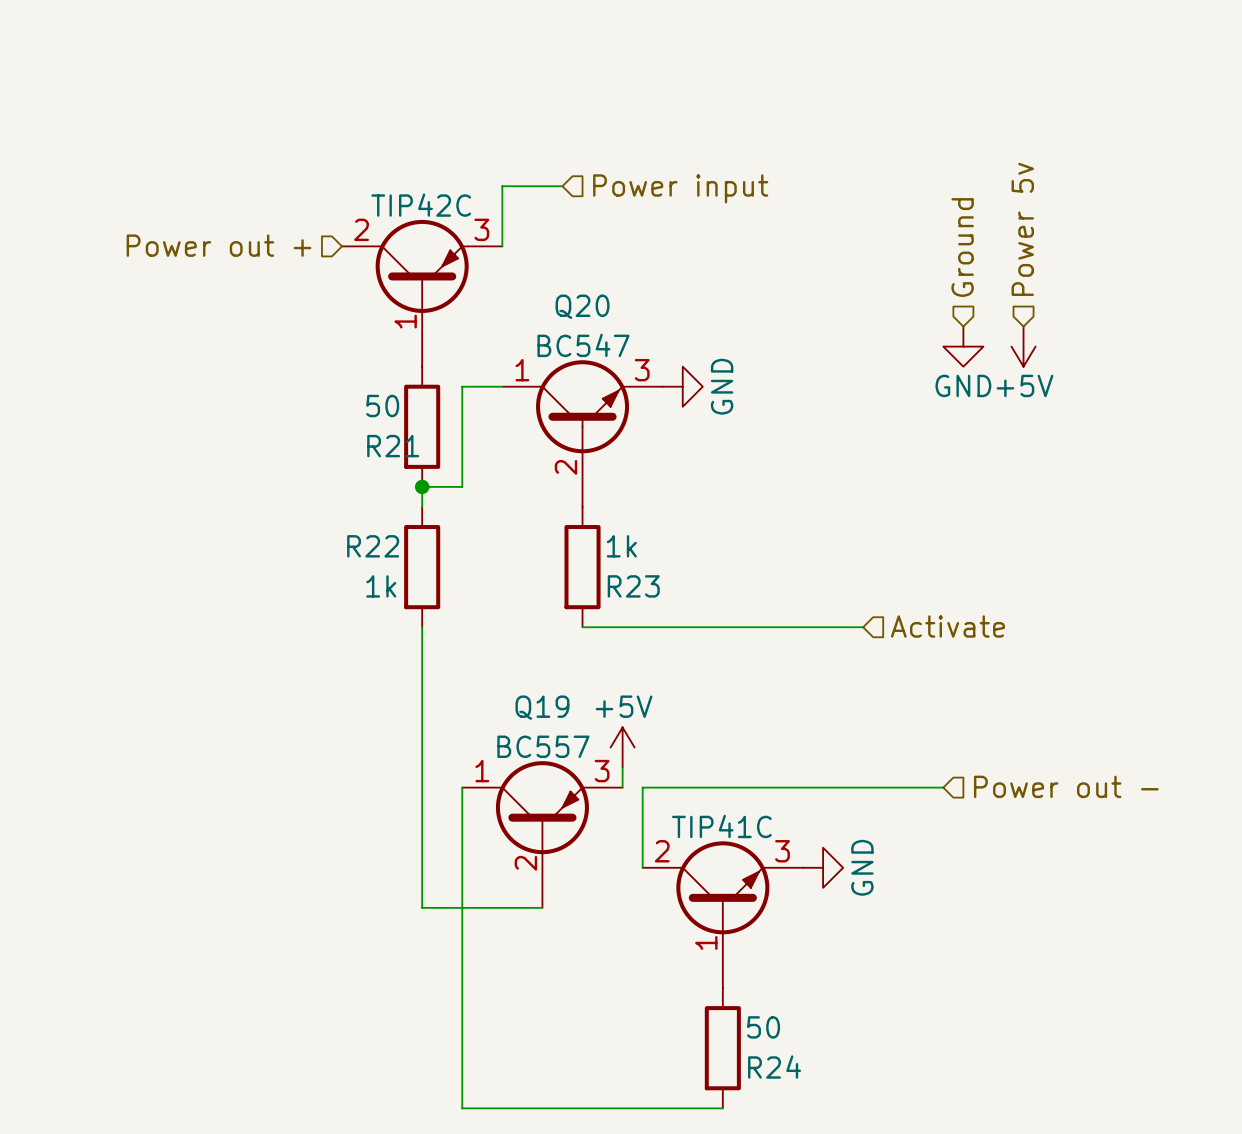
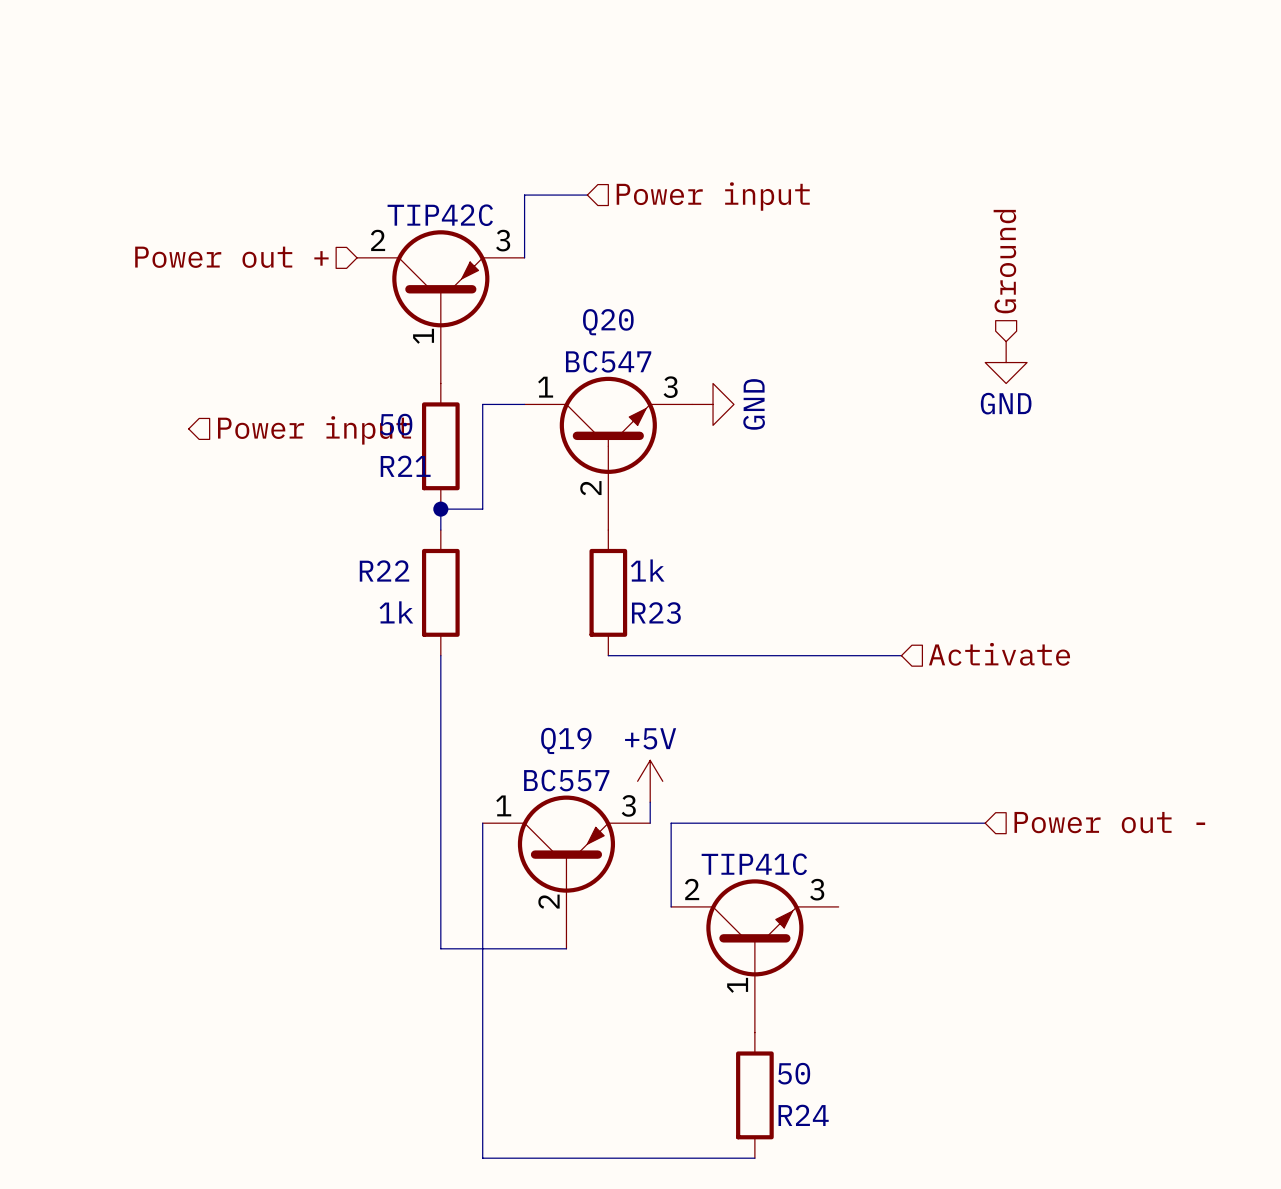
hierarchical label: Power 5v (1022, 229) -> none
power symbol: +5V (1023, 346) -> none
hierarchical label: none -> Power input (314, 430)
power symbol: GND (823, 867) -> none

